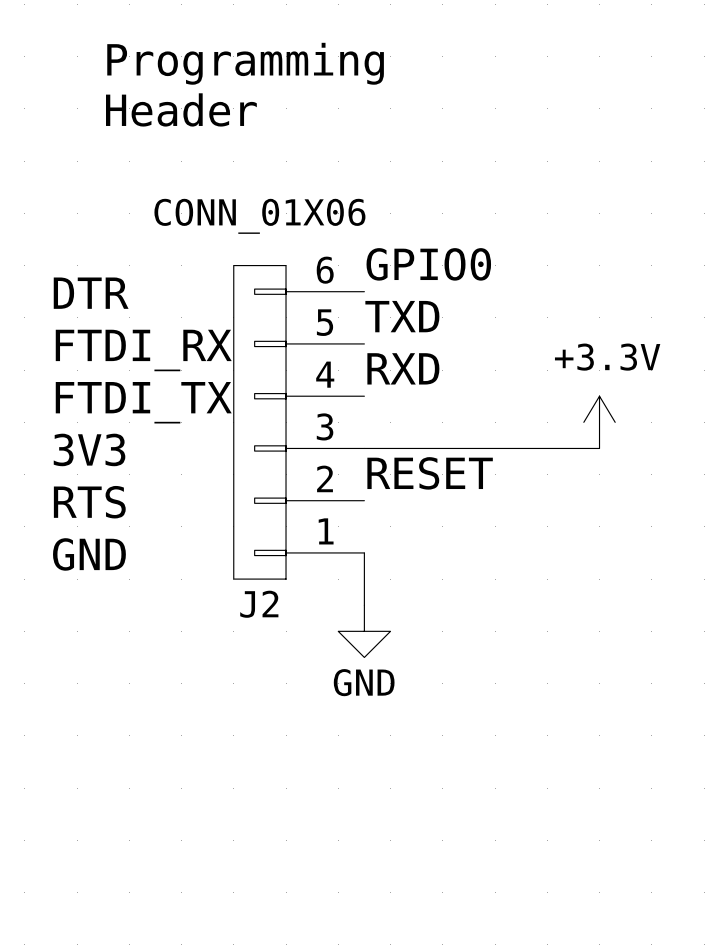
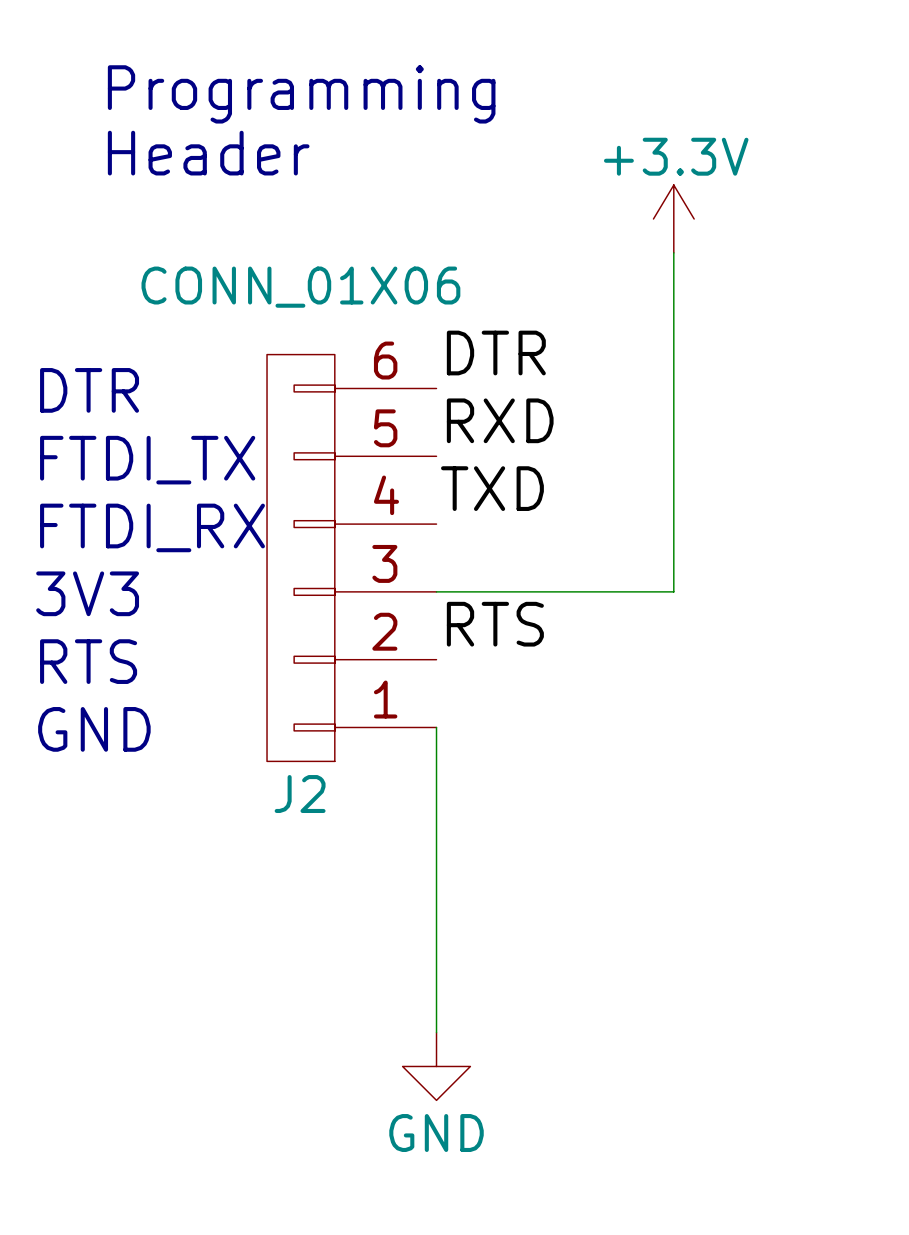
label: GPIO0 (428, 264) -> DTR (496, 353)
label: TXD (402, 316) -> RXD (500, 420)
text: FTDI_RX (143, 350) -> FTDI_TX (147, 460)
power symbol text position: +3.3V (607, 357) -> +3.3V (676, 156)
label: RXD (403, 368) -> TXD (492, 488)
text: FTDI_TX (143, 402) -> FTDI_RX (152, 527)
power symbol position: +3.3V (599, 422) -> +3.3V (673, 219)
wire: (547, 448) (599, 448) -> (673, 591) (673, 252)
label: RESET (430, 473) -> RTS (495, 624)
wire: none -> (436, 795) (436, 1032)
power symbol position: GND (364, 631) -> GND (436, 1066)

